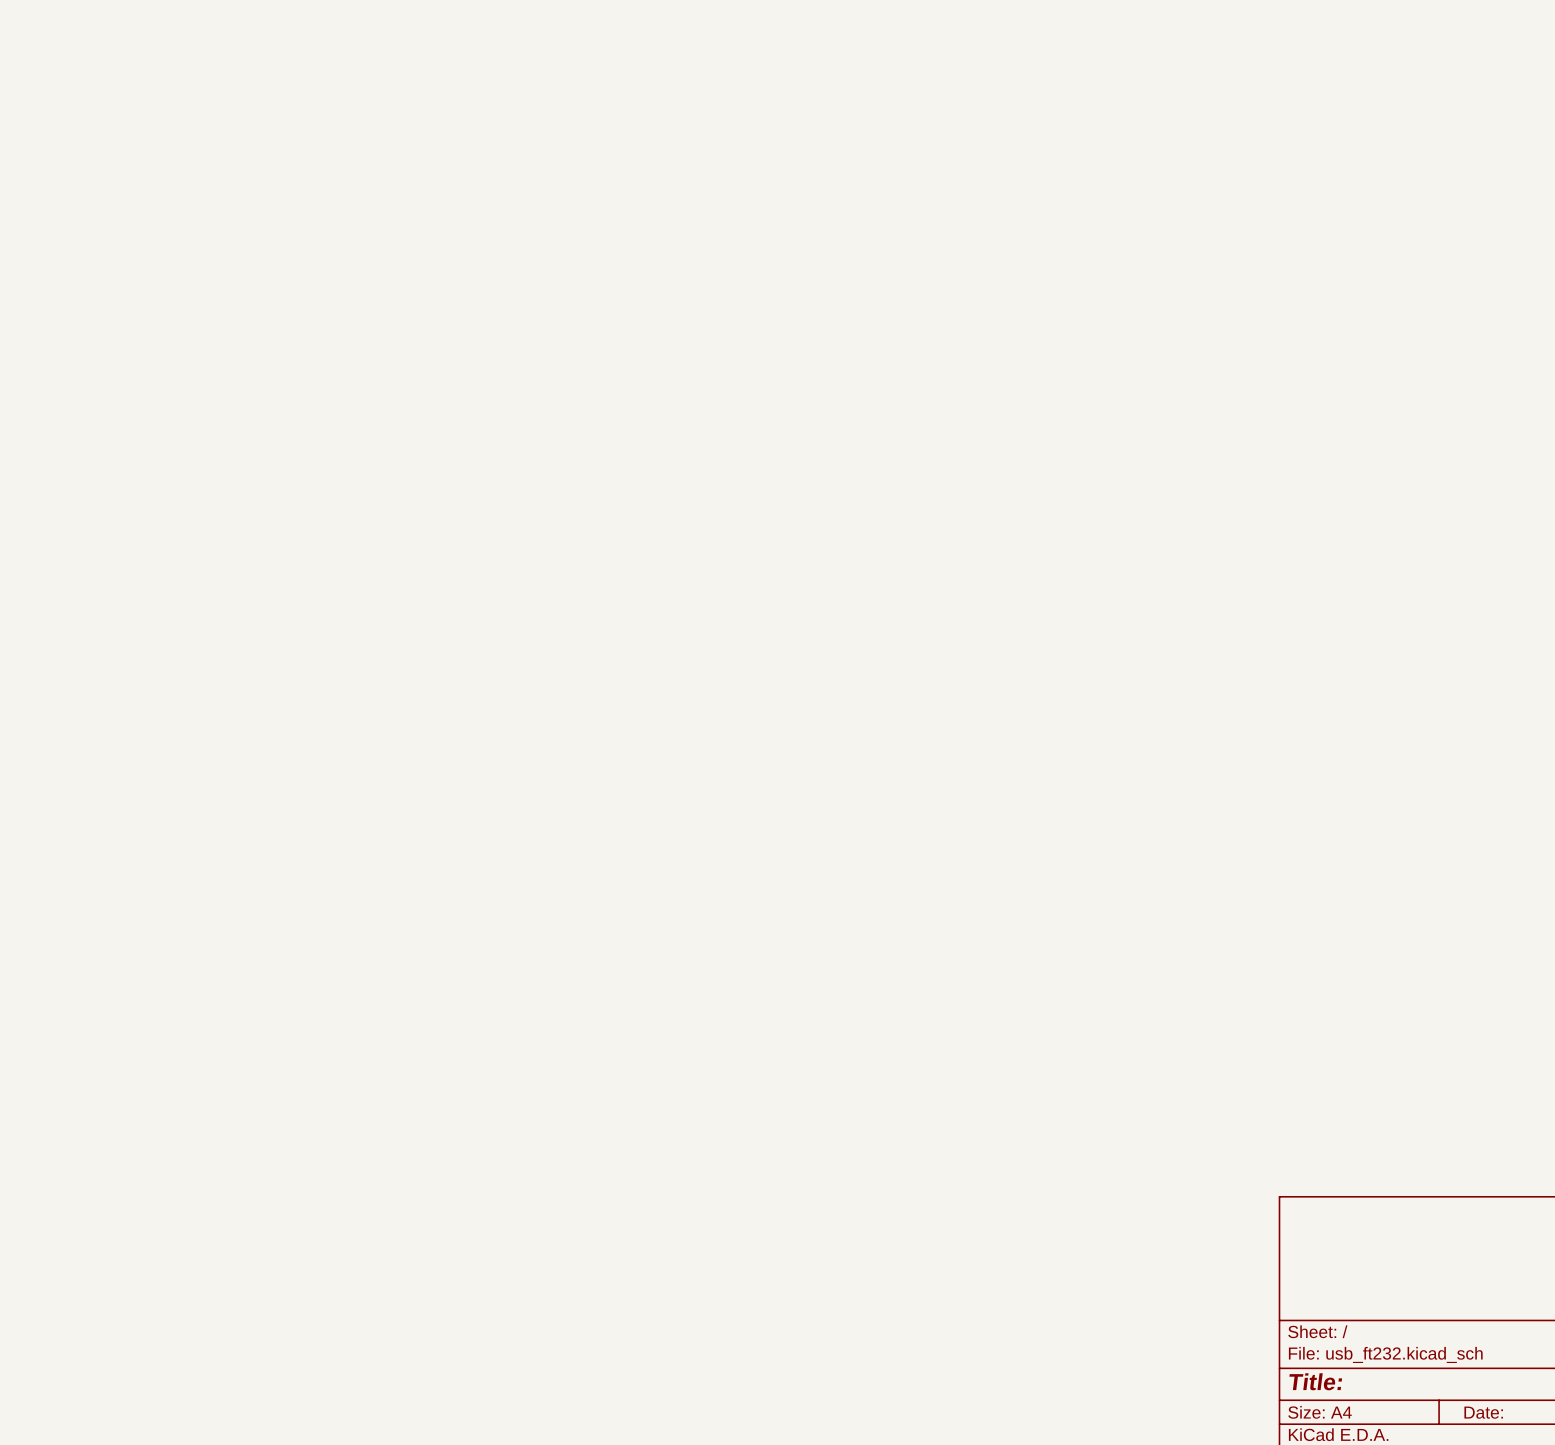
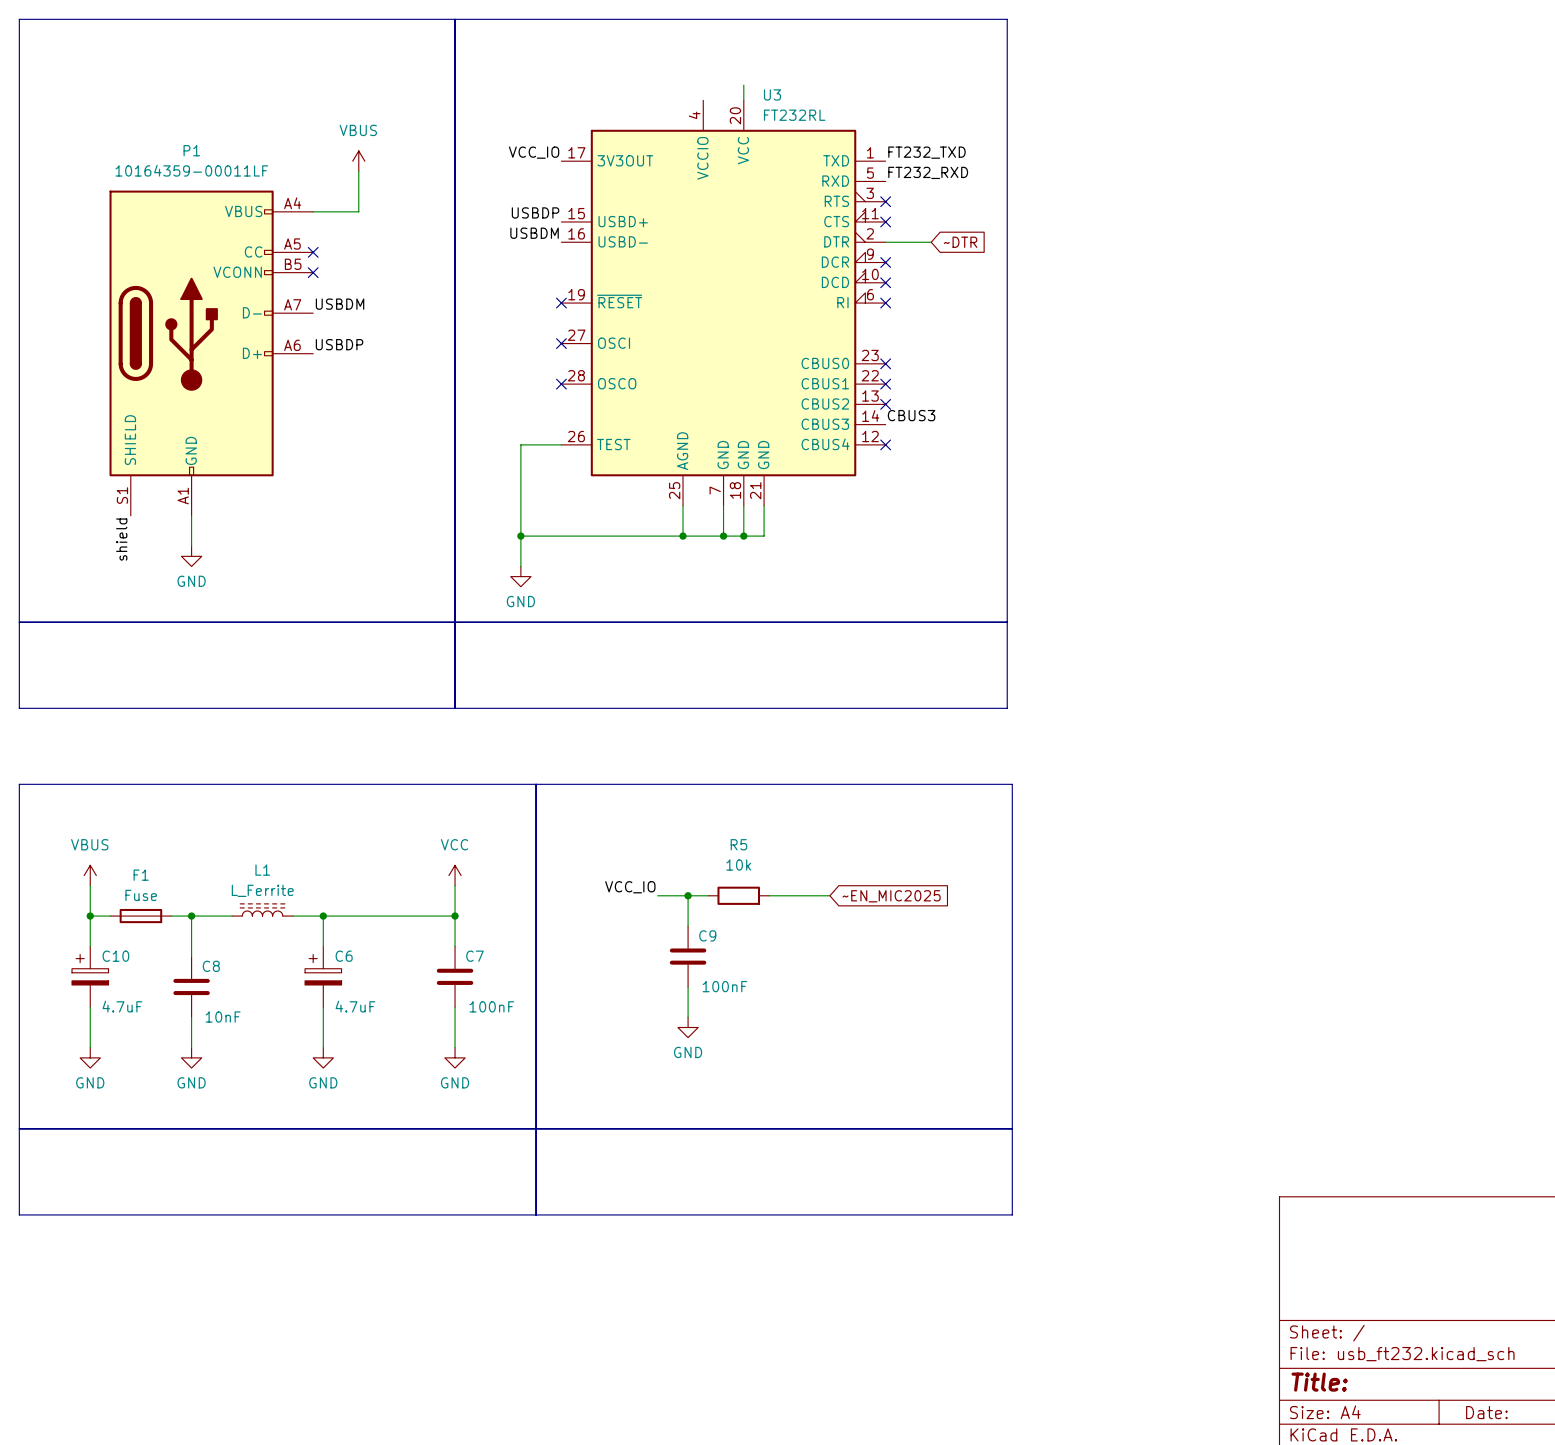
line: none -> (19, 19) (1007, 19) (1007, 708) (19, 708) (19, 19)
line: none -> (455, 19) (455, 708)
wire: none -> (743, 85) (743, 100)
label: none -> VCC_IO (534, 152)
label: none -> FT232_TXD (926, 152)
power symbol: none -> VBUS (358, 161)
wire: none -> (358, 171) (358, 211) (313, 211)
label: none -> FT232_RXD (928, 172)
no-connect mark: none -> (885, 201)
label: none -> USBDP (535, 212)
no-connect mark: none -> (885, 221)
label: none -> USBDM (534, 233)
wire: none -> (885, 242) (931, 242)
global label: none -> ~DTR (960, 242)
no-connect mark: none -> (313, 252)
no-connect mark: none -> (885, 262)
no-connect mark: none -> (313, 272)
no-connect mark: none -> (885, 282)
no-connect mark: none -> (561, 303)
U3: none -> FT232RL (723, 303)
no-connect mark: none -> (885, 303)
label: none -> USBDM (340, 304)
no-connect mark: none -> (561, 343)
label: none -> USBDP (339, 344)
P1: none -> 10164359-00011LF (211, 353)
no-connect mark: none -> (885, 363)
no-connect mark: none -> (561, 384)
no-connect mark: none -> (885, 384)
no-connect mark: none -> (885, 404)
label: none -> CBUS3 (911, 415)
wire: none -> (561, 444) (520, 444) (520, 566)
no-connect mark: none -> (885, 444)
wire: none -> (683, 505) (683, 536)
wire: none -> (723, 505) (723, 536)
wire: none -> (743, 505) (743, 536)
wire: none -> (764, 505) (764, 536) (520, 536)
wire: none -> (191, 515) (191, 546)
label: none -> shield (121, 539)
junction: none -> (520, 536)
junction: none -> (683, 536)
junction: none -> (723, 536)
junction: none -> (743, 536)
power symbol: none -> GND (191, 556)
power symbol: none -> GND (520, 576)
line: none -> (19, 622) (1007, 622)
line: none -> (19, 784) (19, 1214) (1012, 1214) (1012, 784) (19, 784)
line: none -> (536, 784) (536, 1214)
power symbol: none -> VBUS (90, 875)
power symbol: none -> VCC (455, 875)
wire: none -> (90, 885) (90, 946)
wire: none -> (455, 885) (455, 946)
label: none -> VCC_IO (630, 887)
wire: none -> (657, 895) (708, 895)
wire: none -> (688, 895) (688, 926)
junction: none -> (688, 895)
R5: none -> 10k (738, 895)
wire: none -> (769, 895) (829, 895)
global label: none -> ~EN_MIC2025 (891, 896)
L1: none -> L_Ferrite (262, 909)
wire: none -> (90, 916) (110, 916)
junction: none -> (90, 916)
F1: none -> Fuse (140, 916)
wire: none -> (171, 916) (232, 916)
wire: none -> (191, 916) (191, 956)
junction: none -> (191, 916)
wire: none -> (292, 916) (455, 916)
wire: none -> (323, 916) (323, 946)
junction: none -> (323, 916)
junction: none -> (455, 916)
C9: none -> 100nF (688, 956)
C10: none -> 4.7uF (90, 976)
C6: none -> 4.7uF (323, 976)
C7: none -> 100nF (455, 976)
C8: none -> 10nF (191, 986)
wire: none -> (688, 986) (688, 1017)
wire: none -> (90, 1007) (90, 1047)
wire: none -> (323, 1007) (323, 1047)
wire: none -> (455, 1007) (455, 1047)
wire: none -> (191, 1017) (191, 1047)
power symbol: none -> GND (688, 1027)
power symbol: none -> GND (90, 1057)
power symbol: none -> GND (191, 1057)
power symbol: none -> GND (323, 1057)
power symbol: none -> GND (455, 1057)
line: none -> (19, 1128) (1012, 1128)

